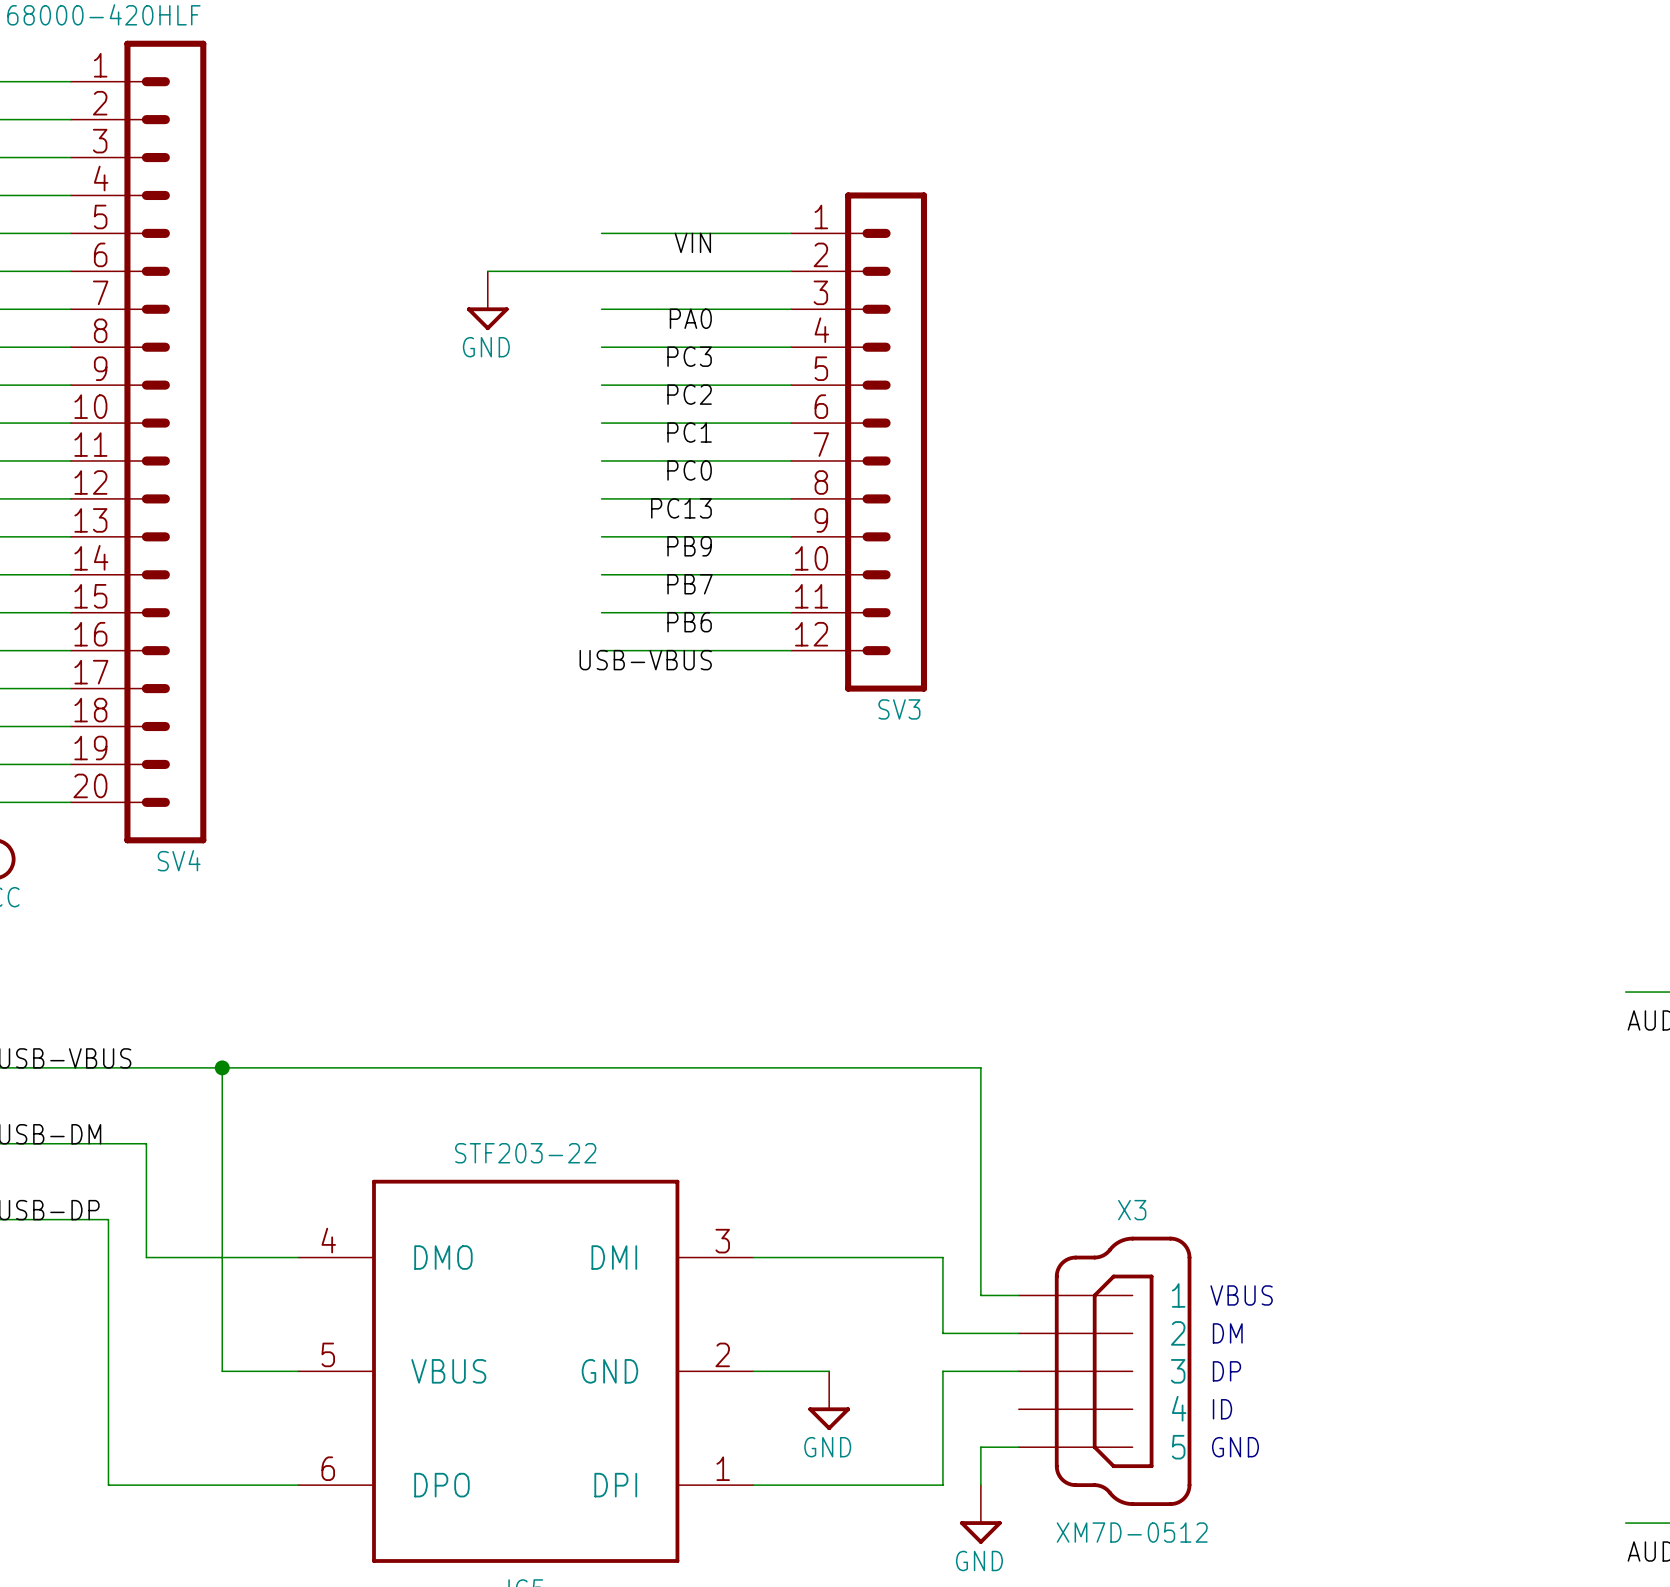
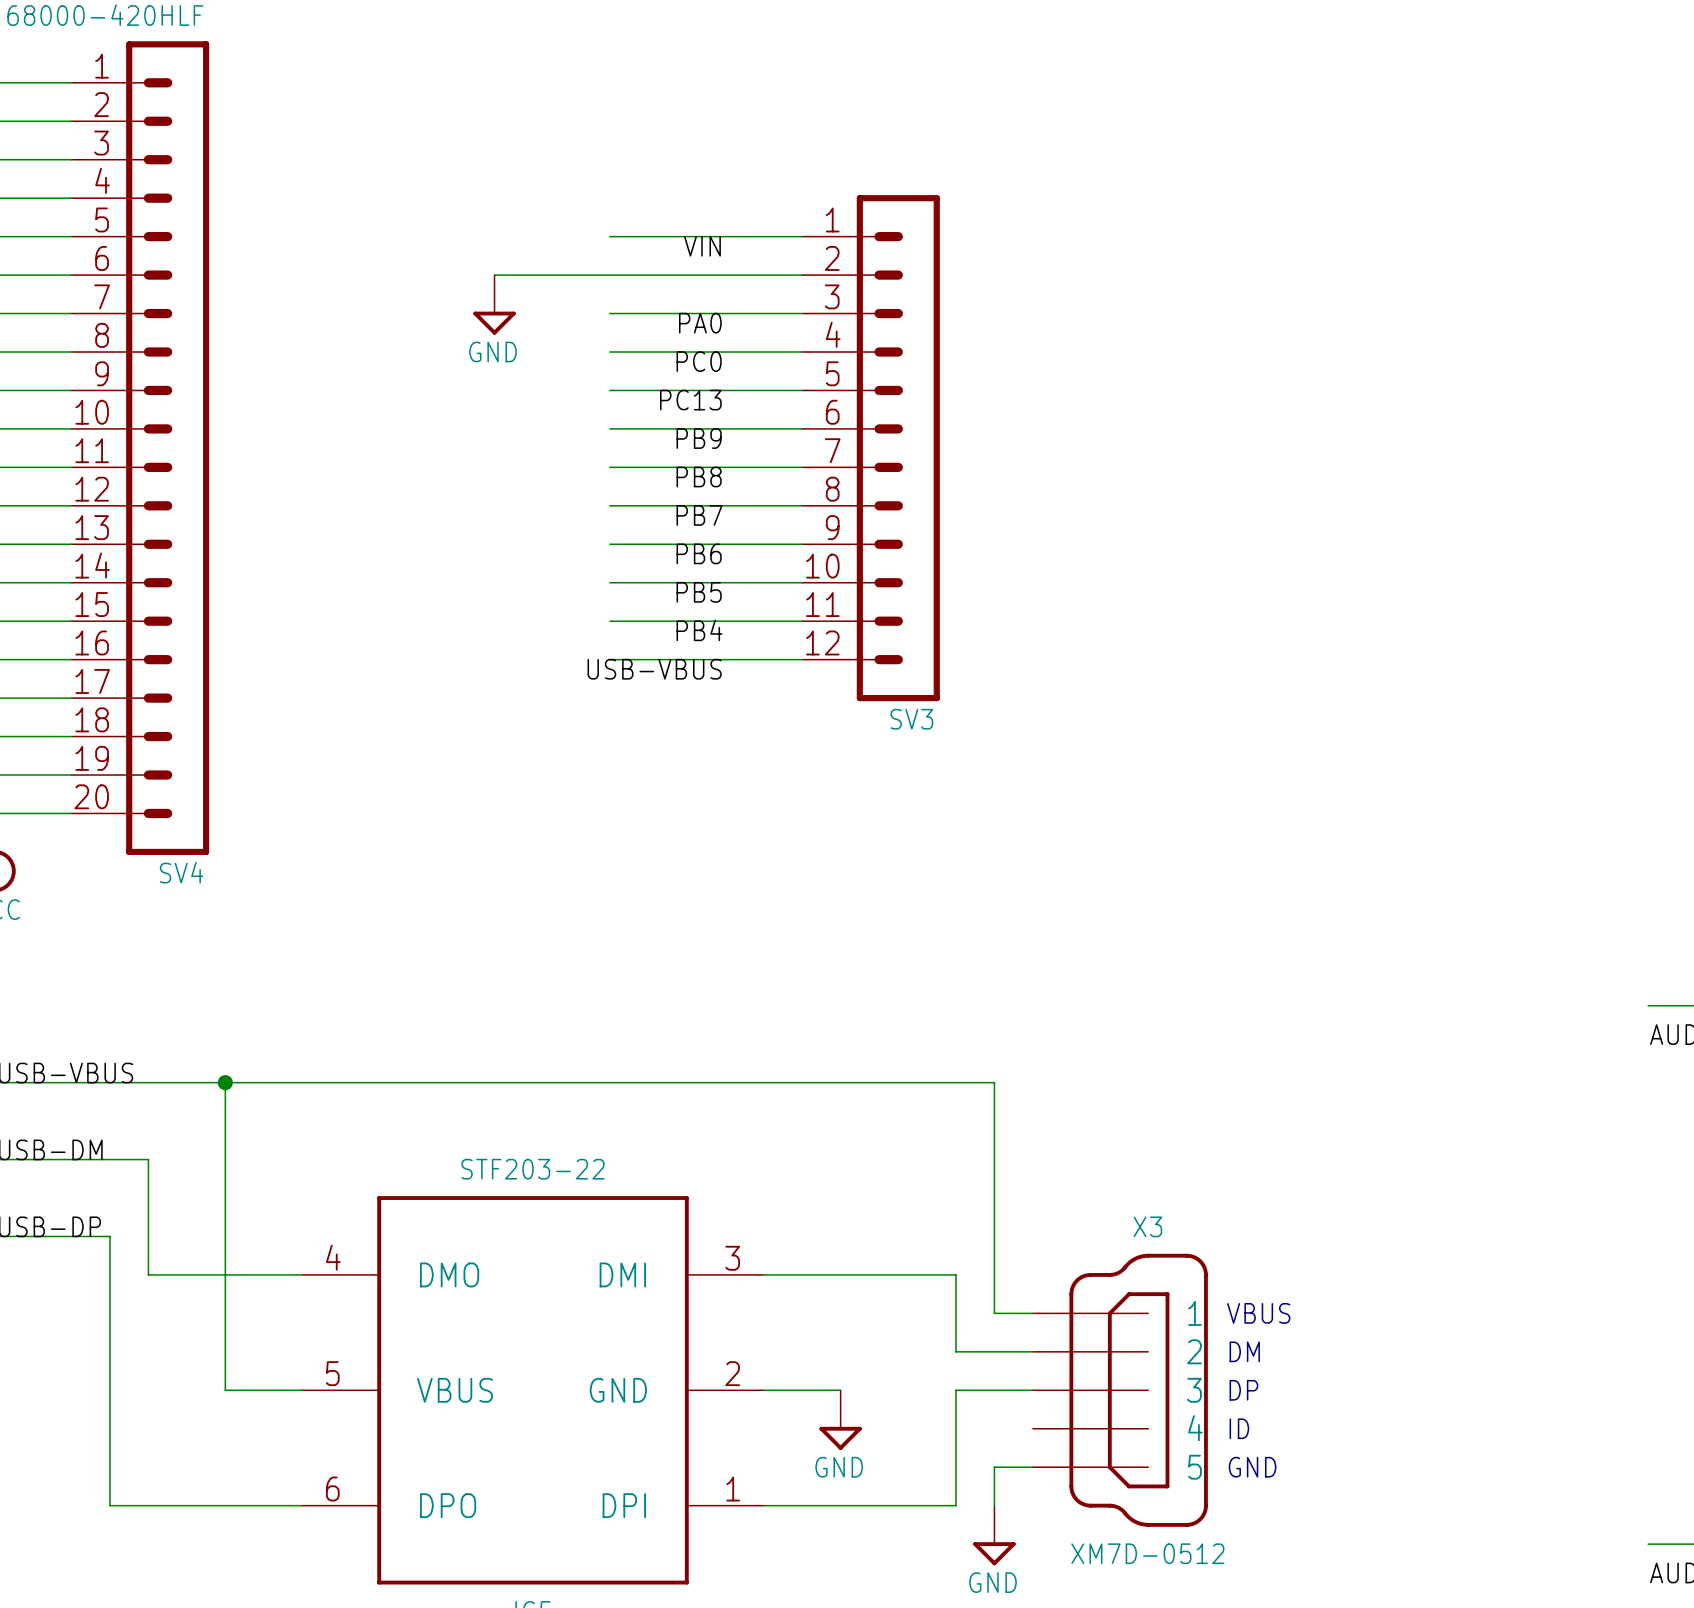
label: PC3 (689, 356) -> PC0 (699, 361)
label: PC2 (689, 394) -> PC13 (690, 400)
label: PC1 (689, 432) -> PB9 (699, 438)
label: PC0 (689, 470) -> PB8 (699, 476)
label: PC13 (681, 508) -> PB7 (699, 515)
label: PB9 (689, 546) -> PB6 (699, 553)
label: PB7 (689, 584) -> PB5 (699, 592)
label: PB6 (689, 622) -> PB4 (699, 630)

